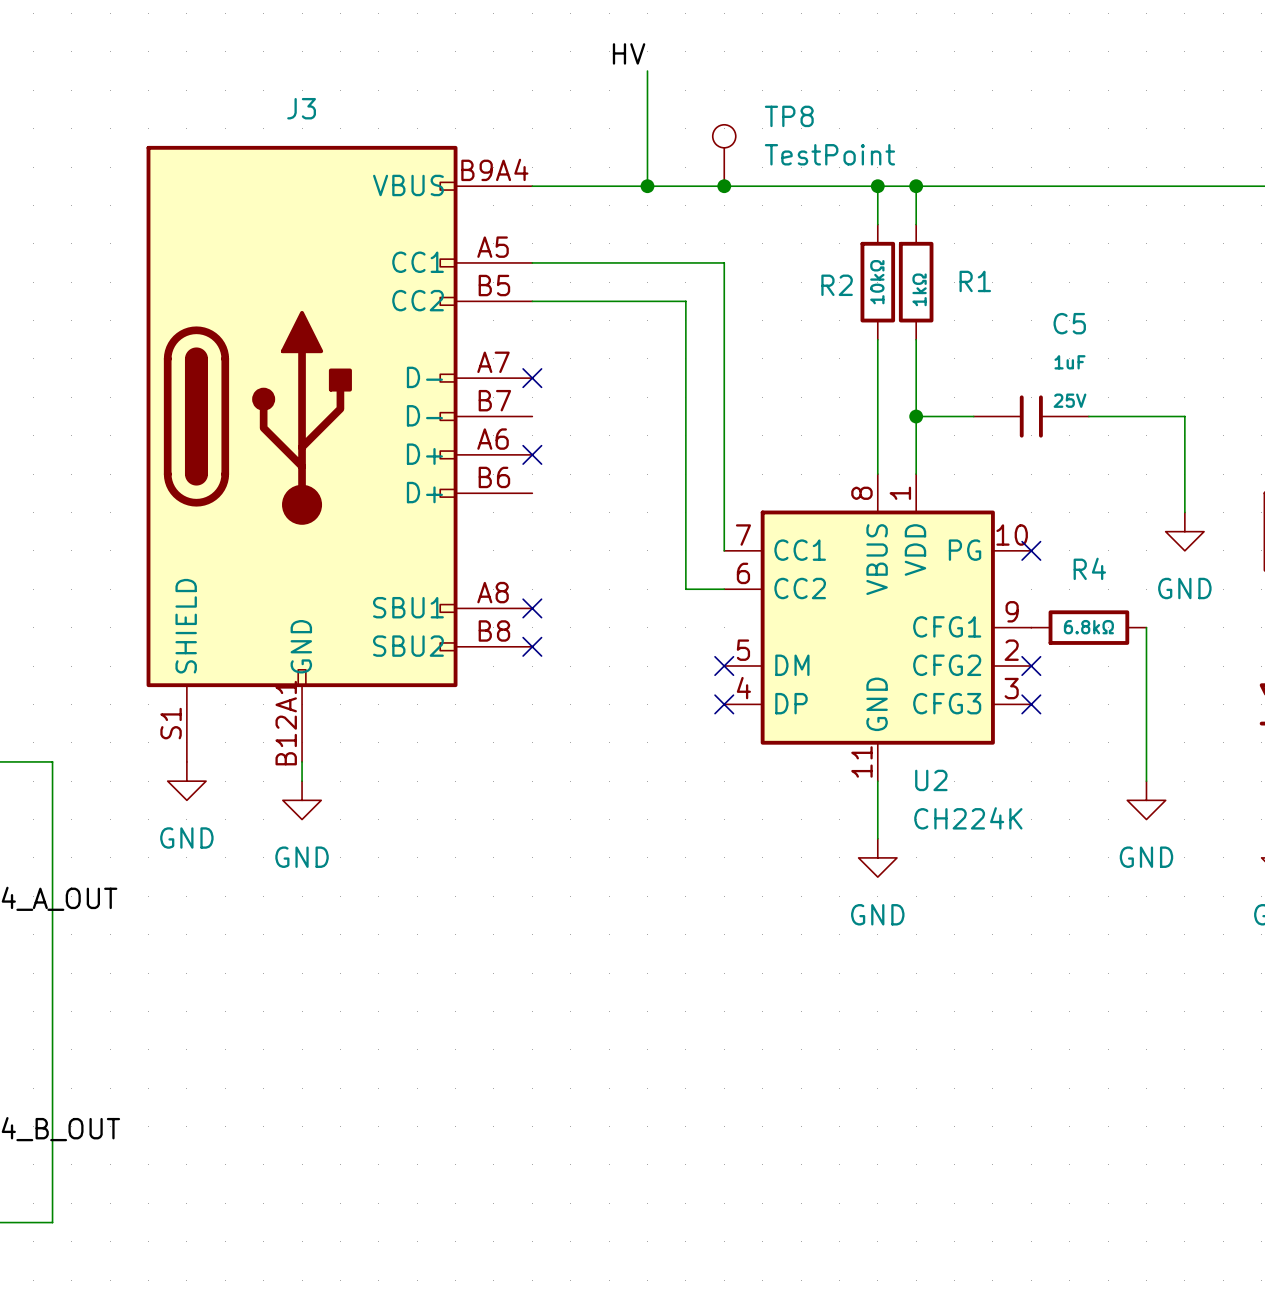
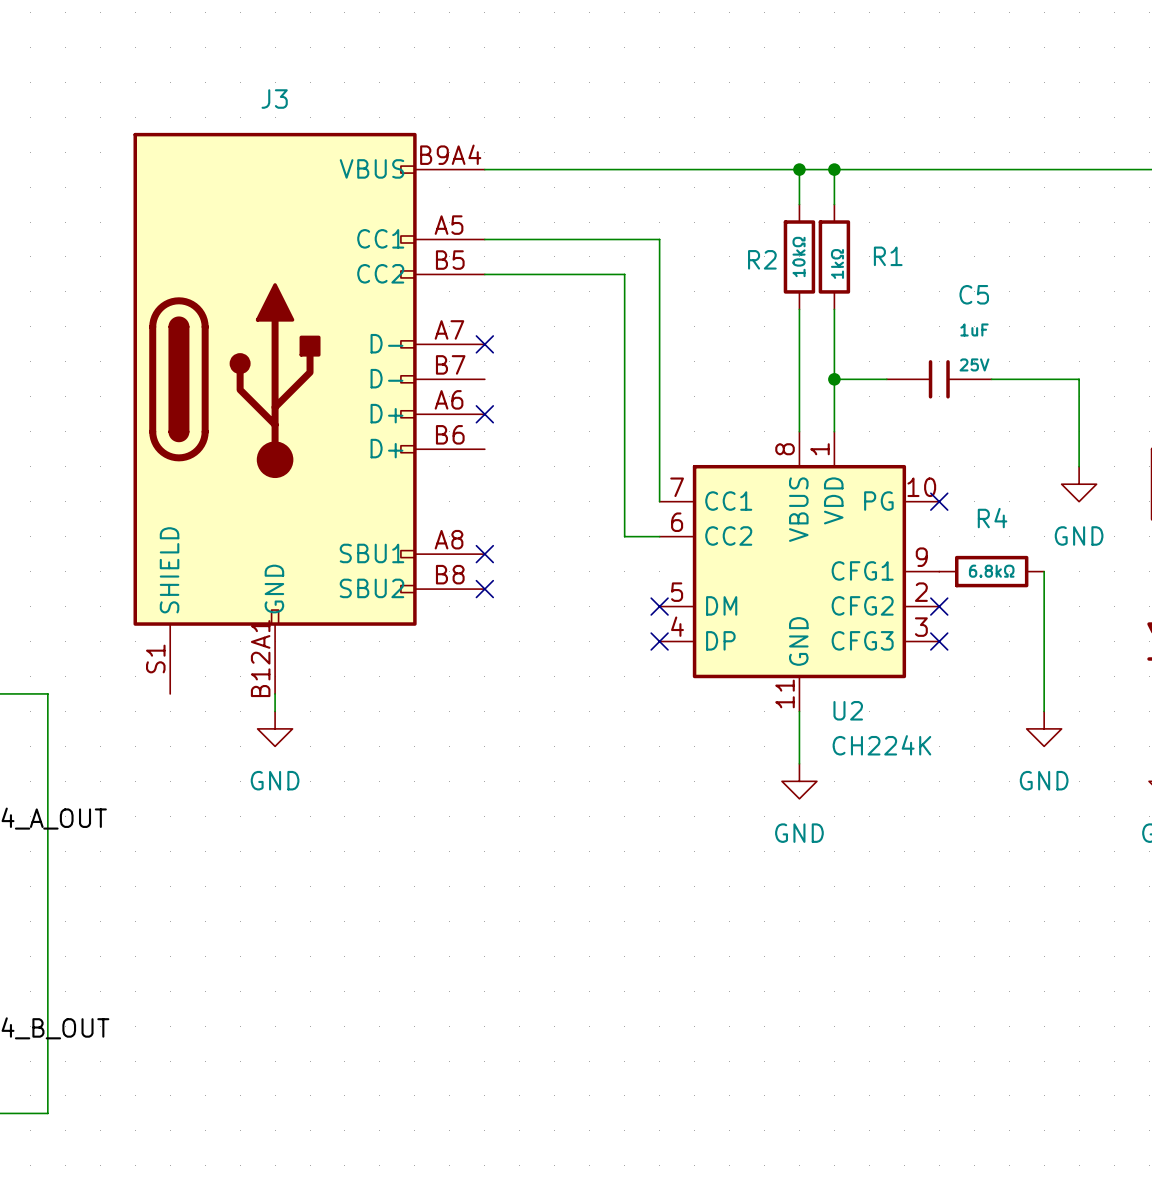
label: HV (629, 53) -> none
wire: (647, 71) (647, 186) -> none
TP8: TestPoint (724, 155) -> none
junction: (647, 186) -> none
junction: (724, 186) -> none
power symbol: GND (186, 781) -> none

